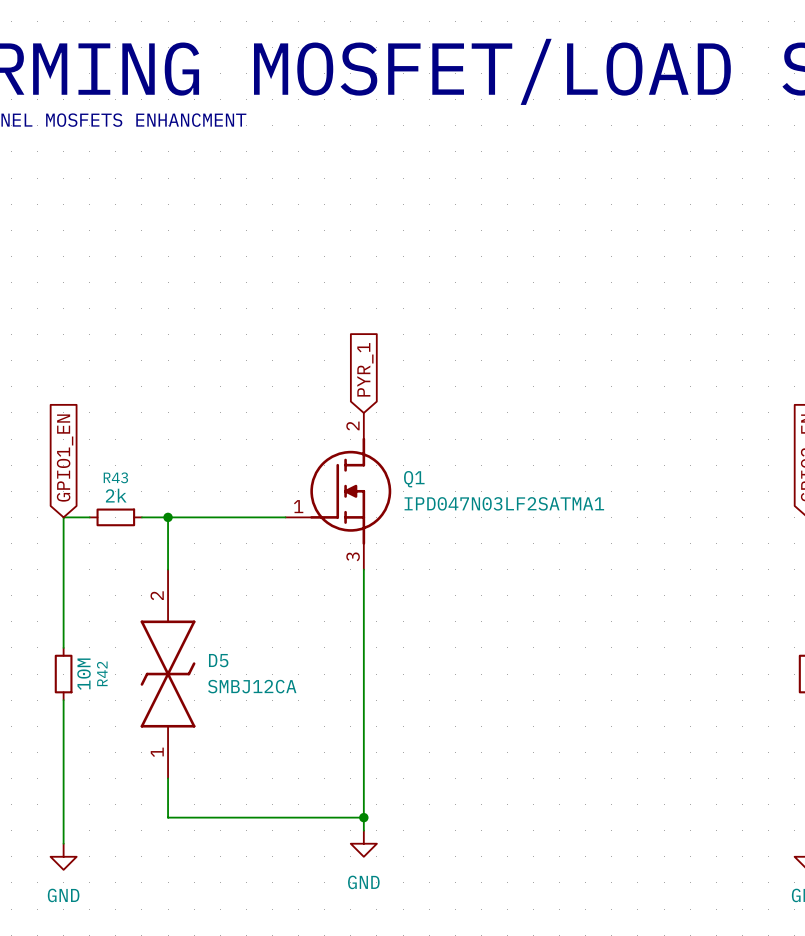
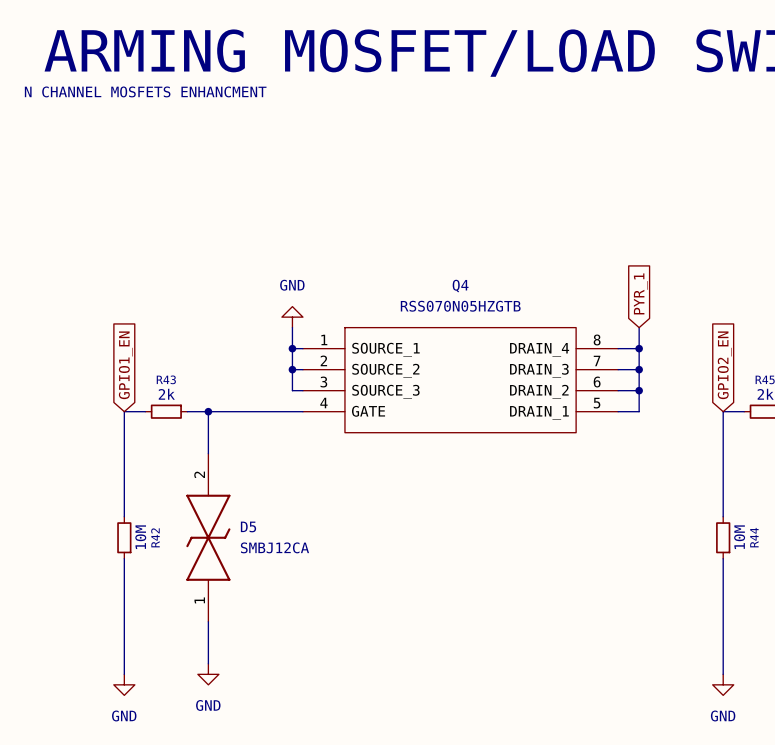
global label: PYR_1 (365, 369) -> none
global label: none -> PYR_1 (640, 293)
power symbol: none -> GND (292, 317)
wire: none -> (292, 327) (292, 390) (302, 390)
wire: none -> (639, 327) (639, 411) (618, 411)
wire: none -> (292, 348) (302, 348)
junction: none -> (292, 348)
wire: none -> (618, 348) (639, 348)
junction: none -> (639, 348)
wire: none -> (292, 369) (302, 369)
junction: none -> (292, 369)
wire: none -> (618, 369) (639, 369)
junction: none -> (639, 369)
Q4: none -> RSS070N05HZGTB (460, 380)
Q1: IPD047N03LF2SATMA1 (338, 491) -> none
wire: none -> (618, 390) (639, 390)
junction: none -> (639, 390)
wire: (363, 569) (363, 830) -> none
wire: (168, 817) (363, 817) -> (208, 653) (208, 663)
junction: (363, 817) -> none
power symbol position: GND (363, 843) -> GND (208, 674)

